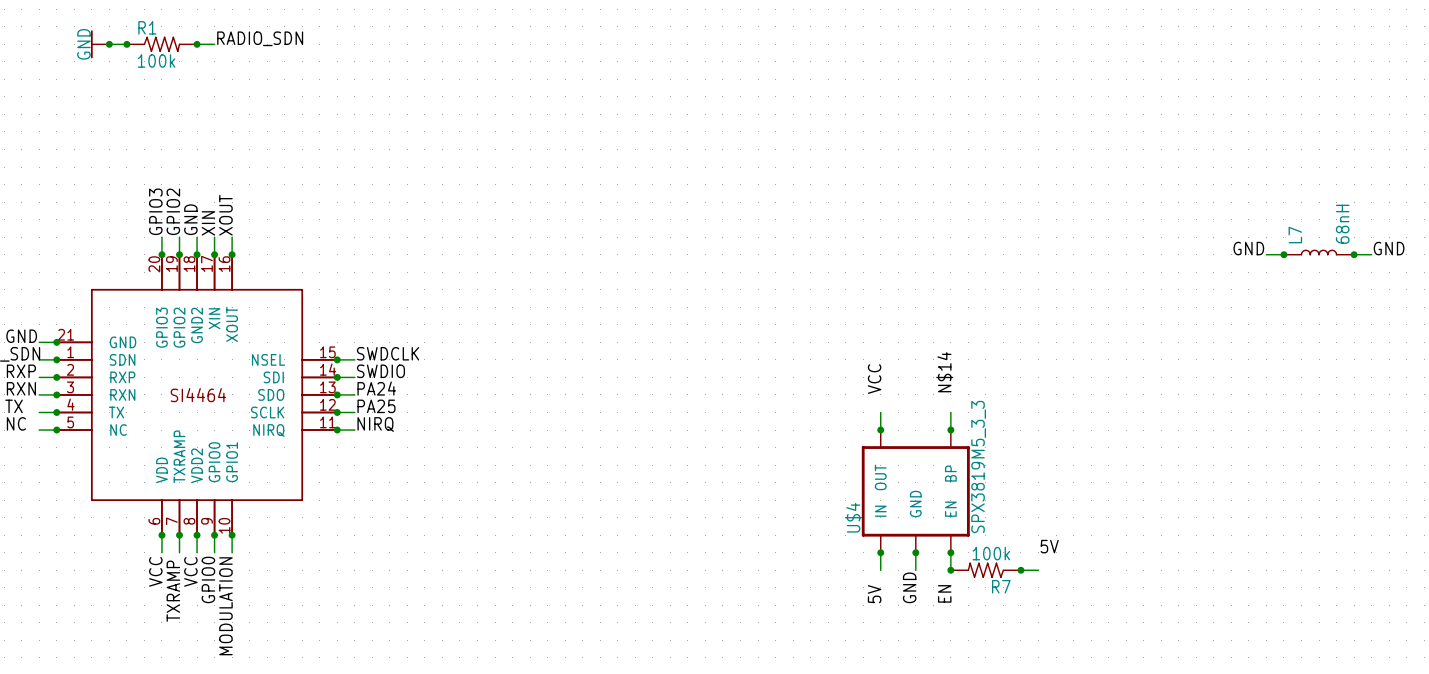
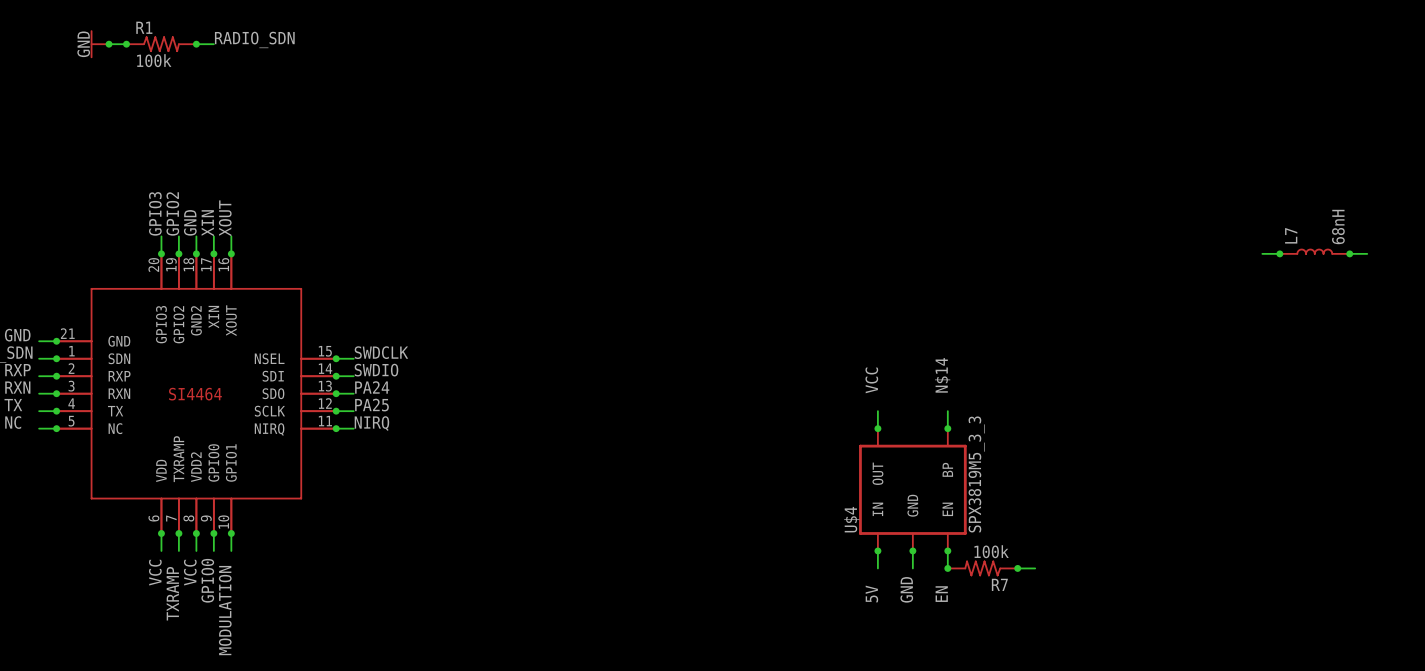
label: GND (1248, 248) -> none
label: GND (1389, 248) -> none
label: 5V (1049, 546) -> none

